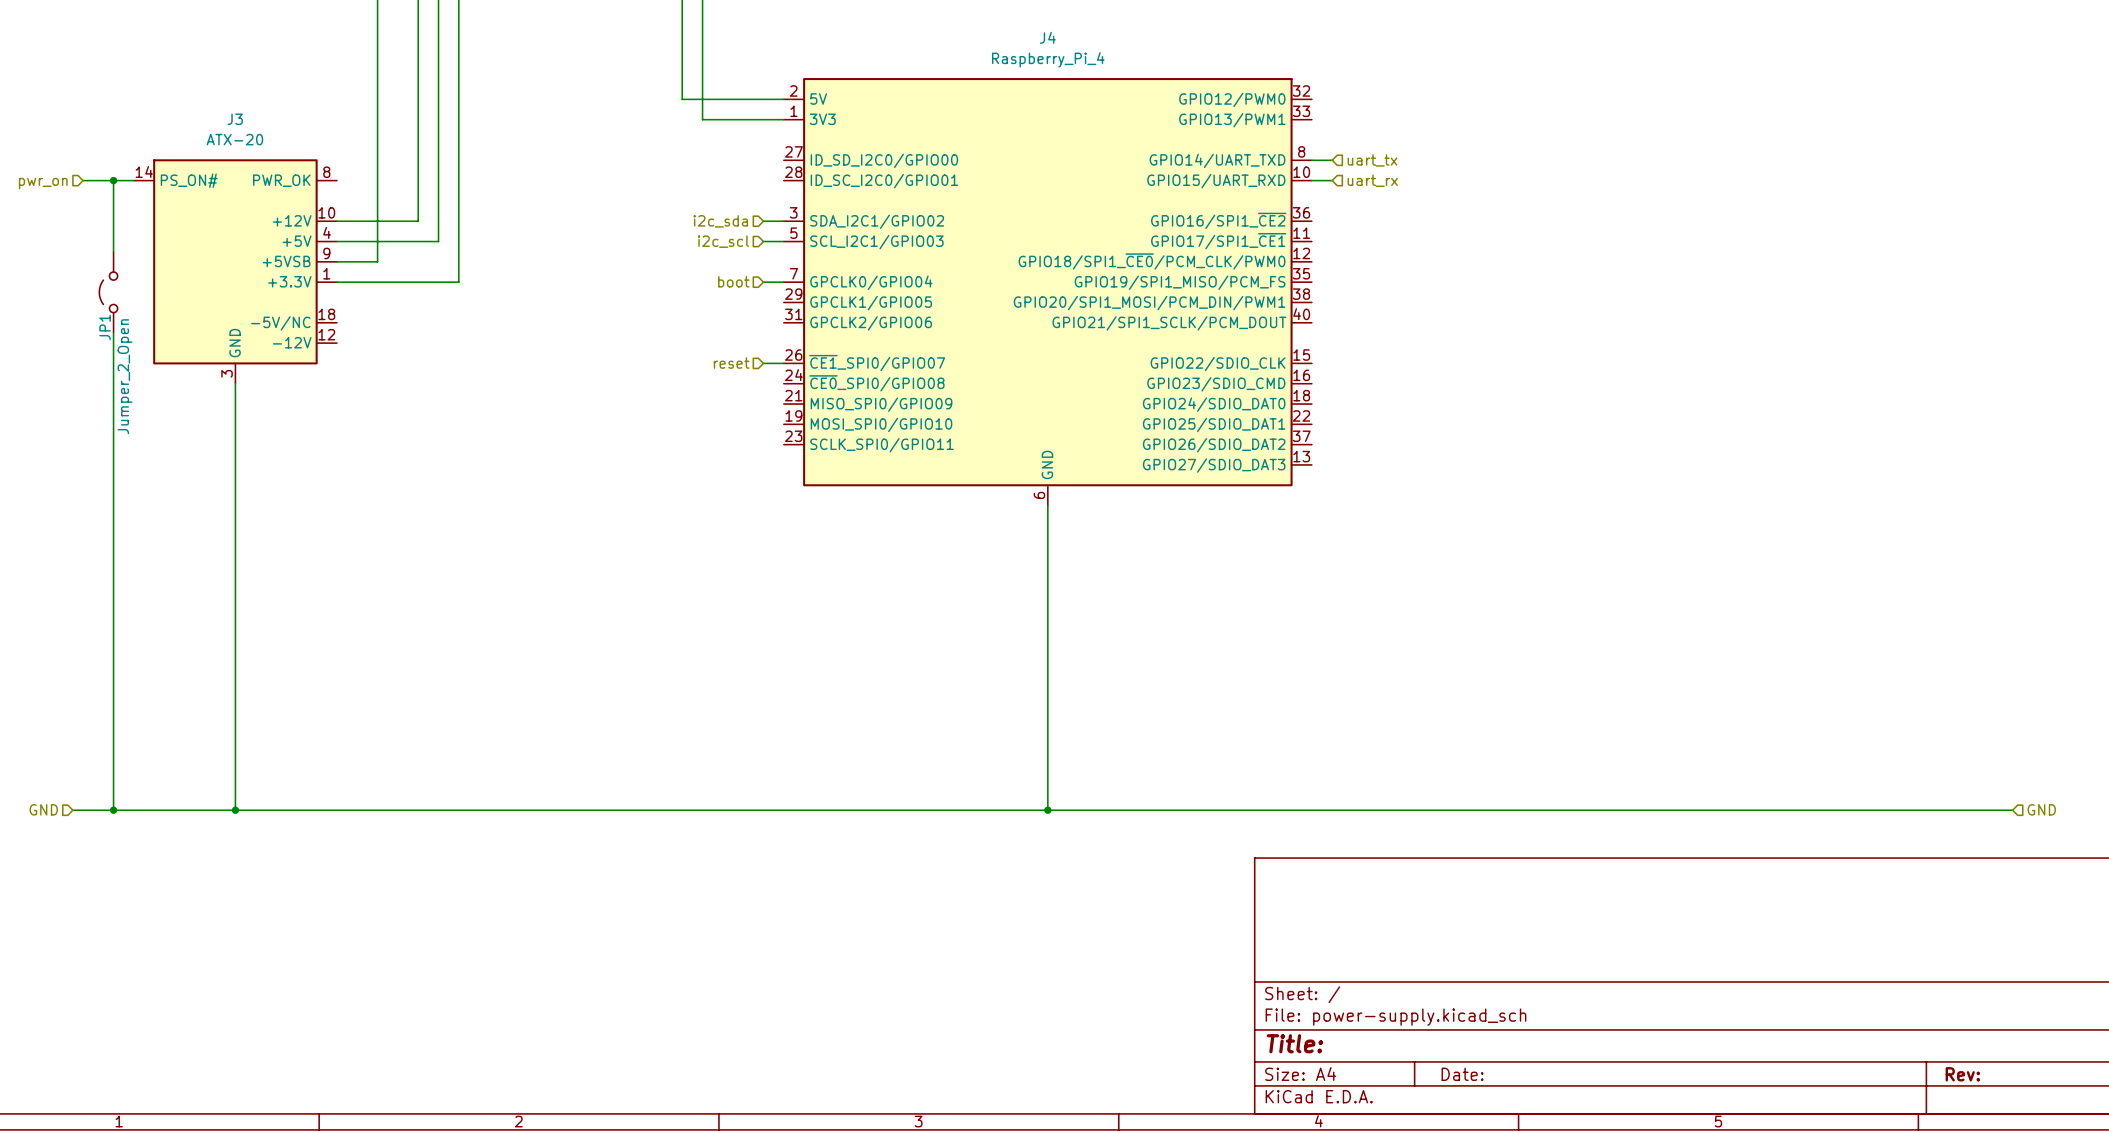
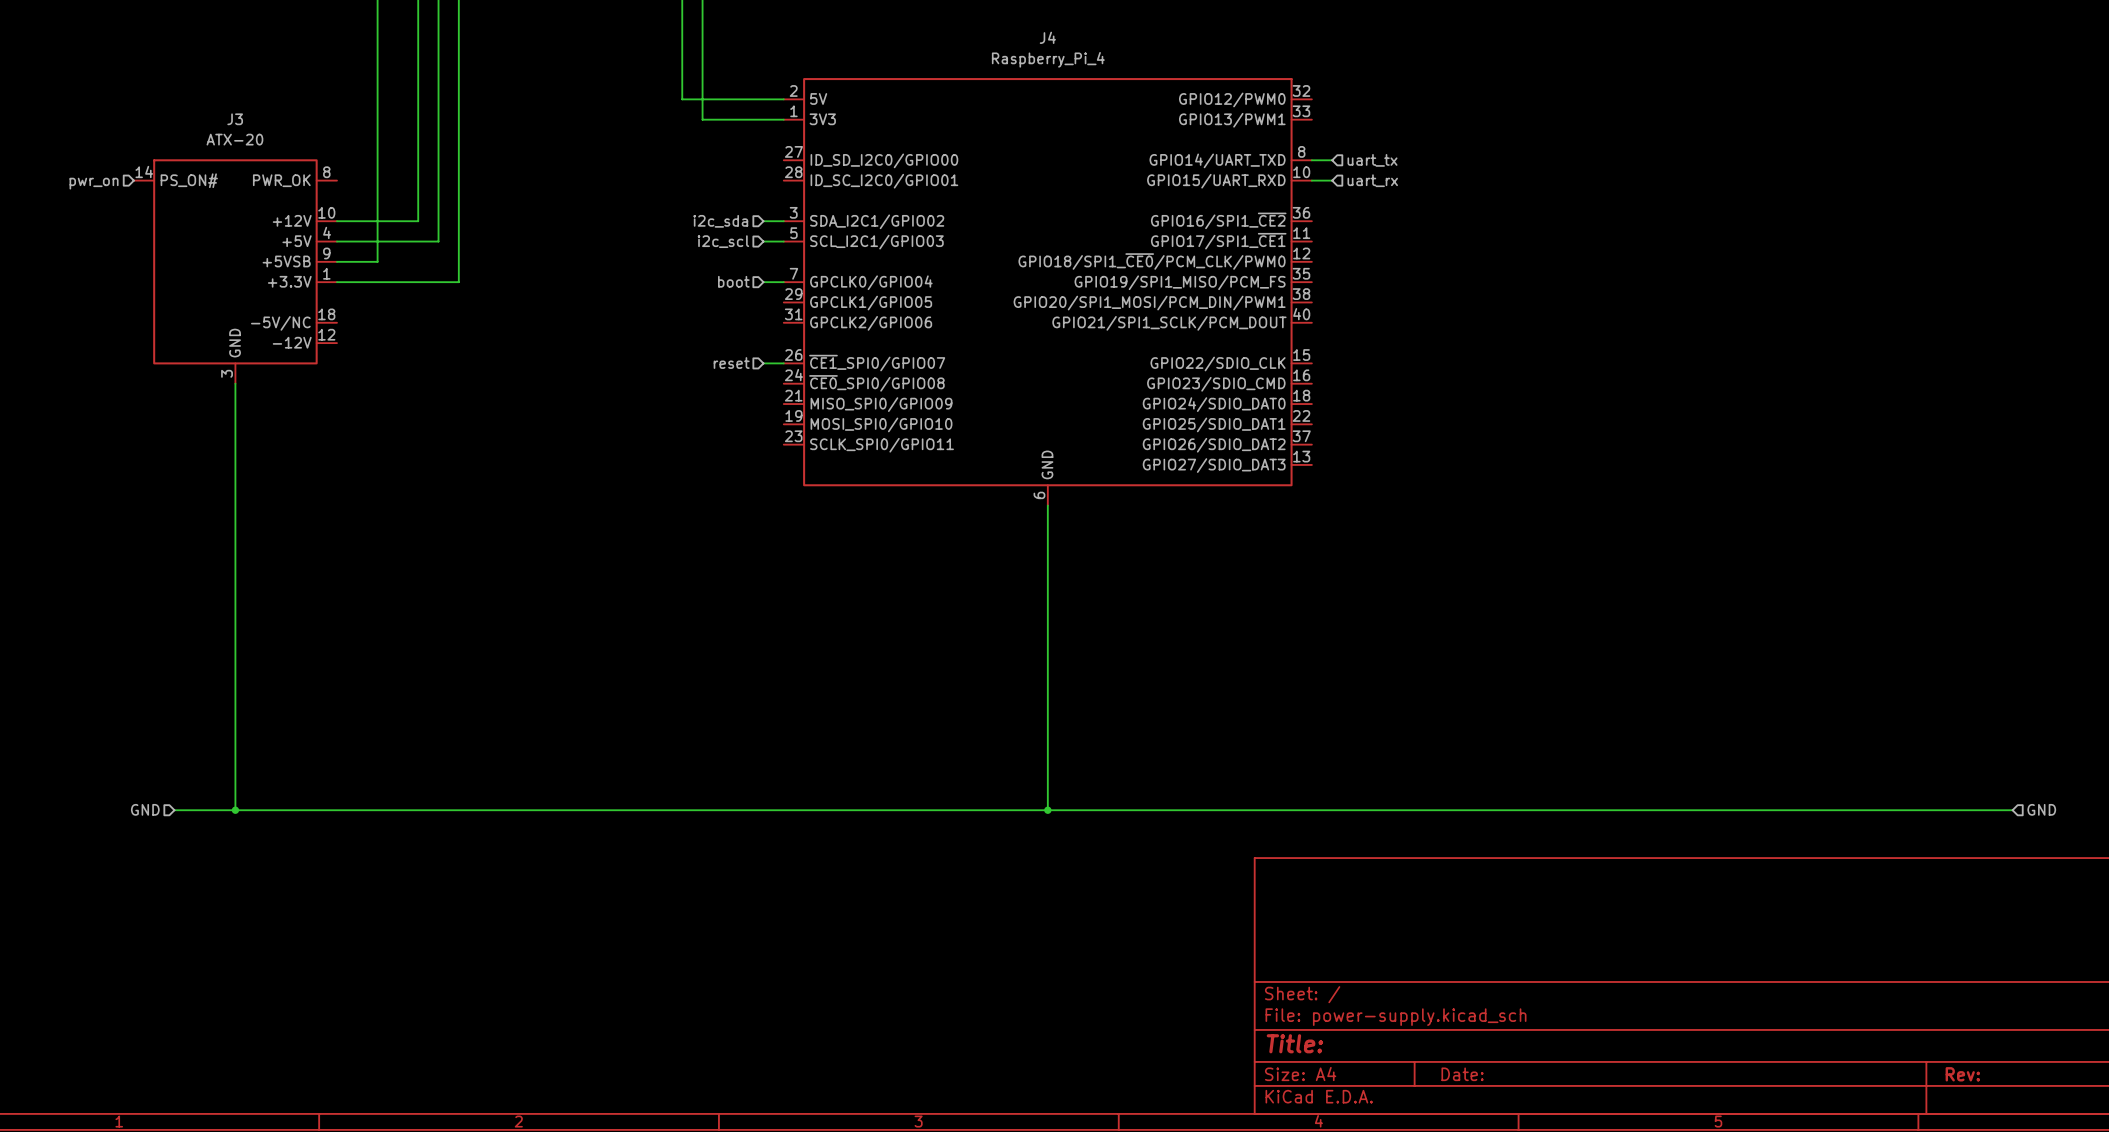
wire: (83, 180) (133, 180) -> none
wire: (113, 180) (113, 251) -> none
junction: (113, 180) -> none
hierarchical label position: pwr_on (43, 183) -> pwr_on (94, 183)
JP1: Jumper_2_Open (108, 292) -> none
wire: (113, 332) (113, 810) -> none
hierarchical label position: GND (43, 809) -> GND (145, 809)
wire: (72, 810) (174, 810) -> none
junction: (113, 810) -> none

